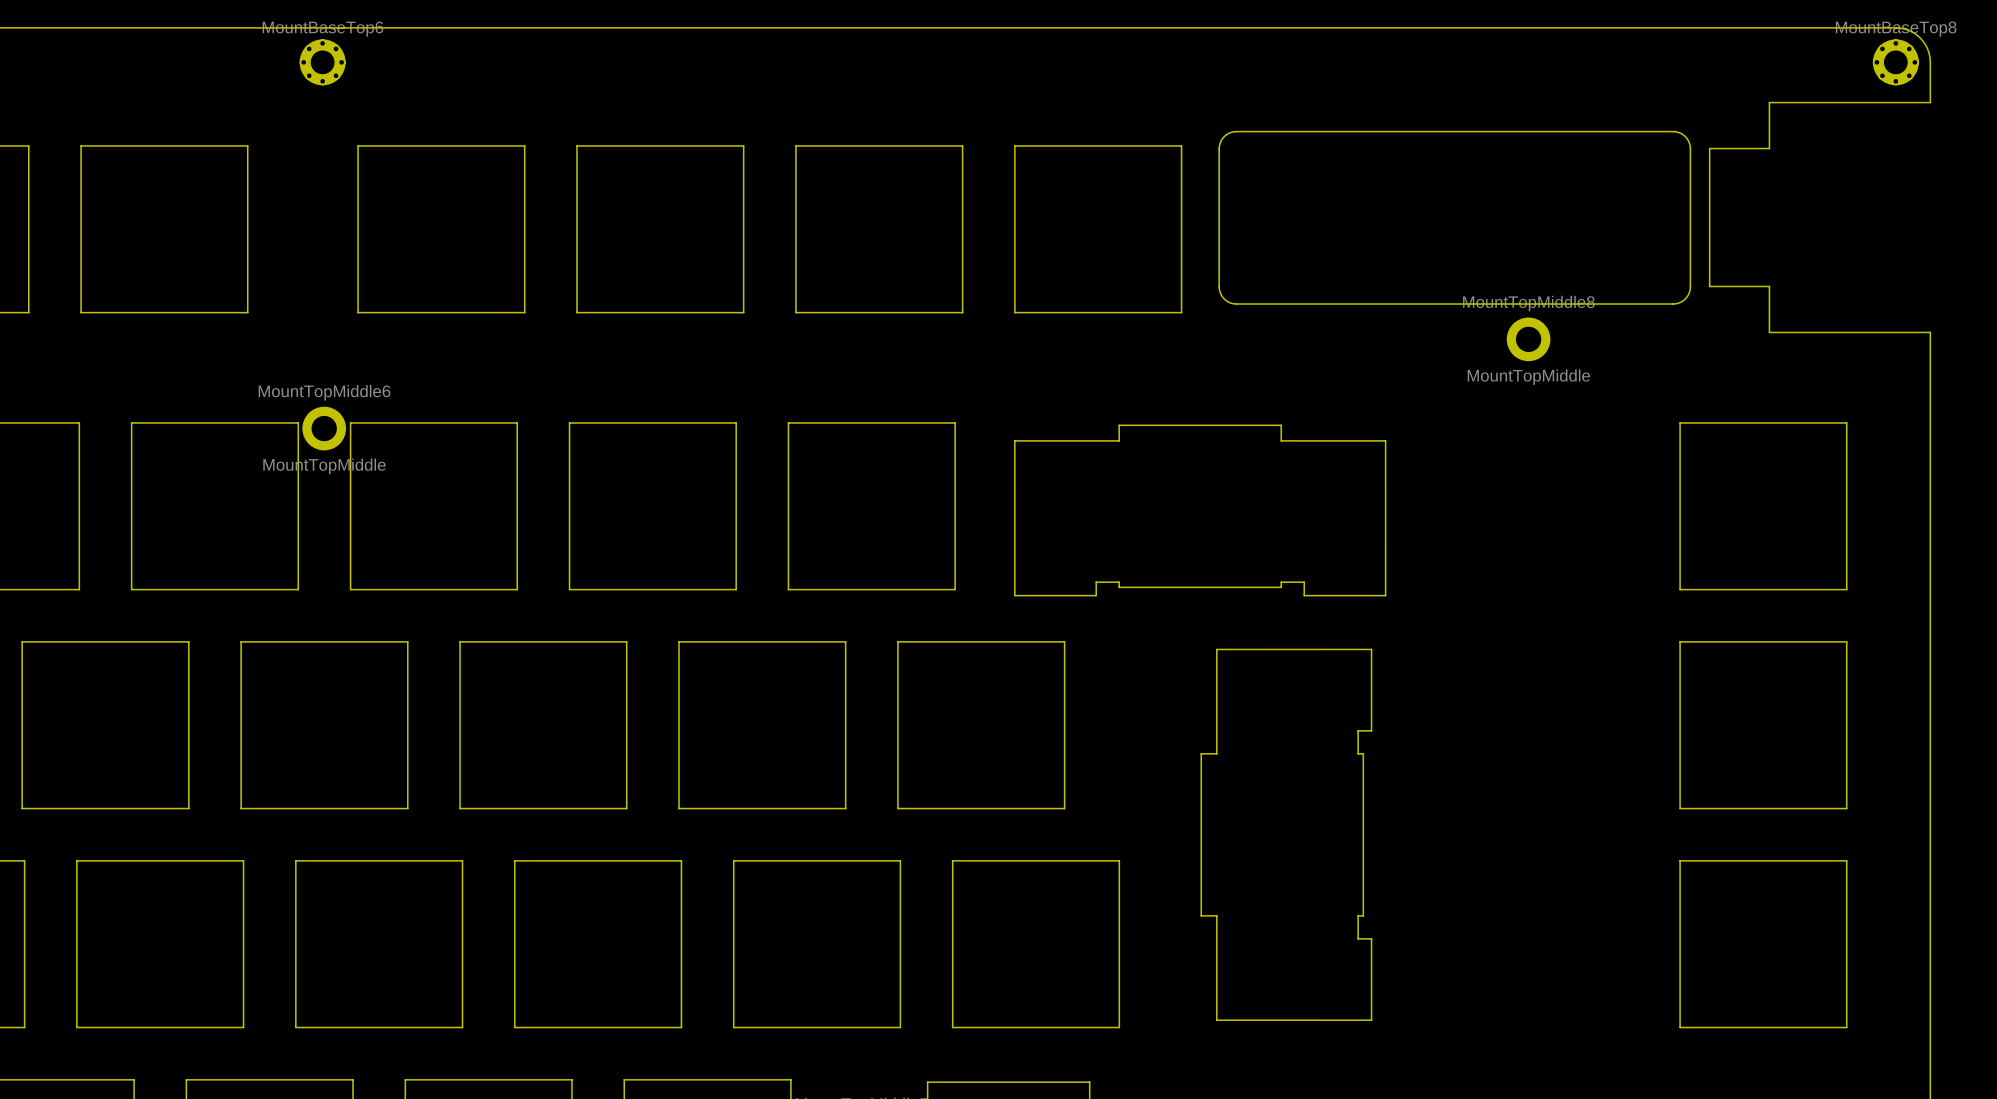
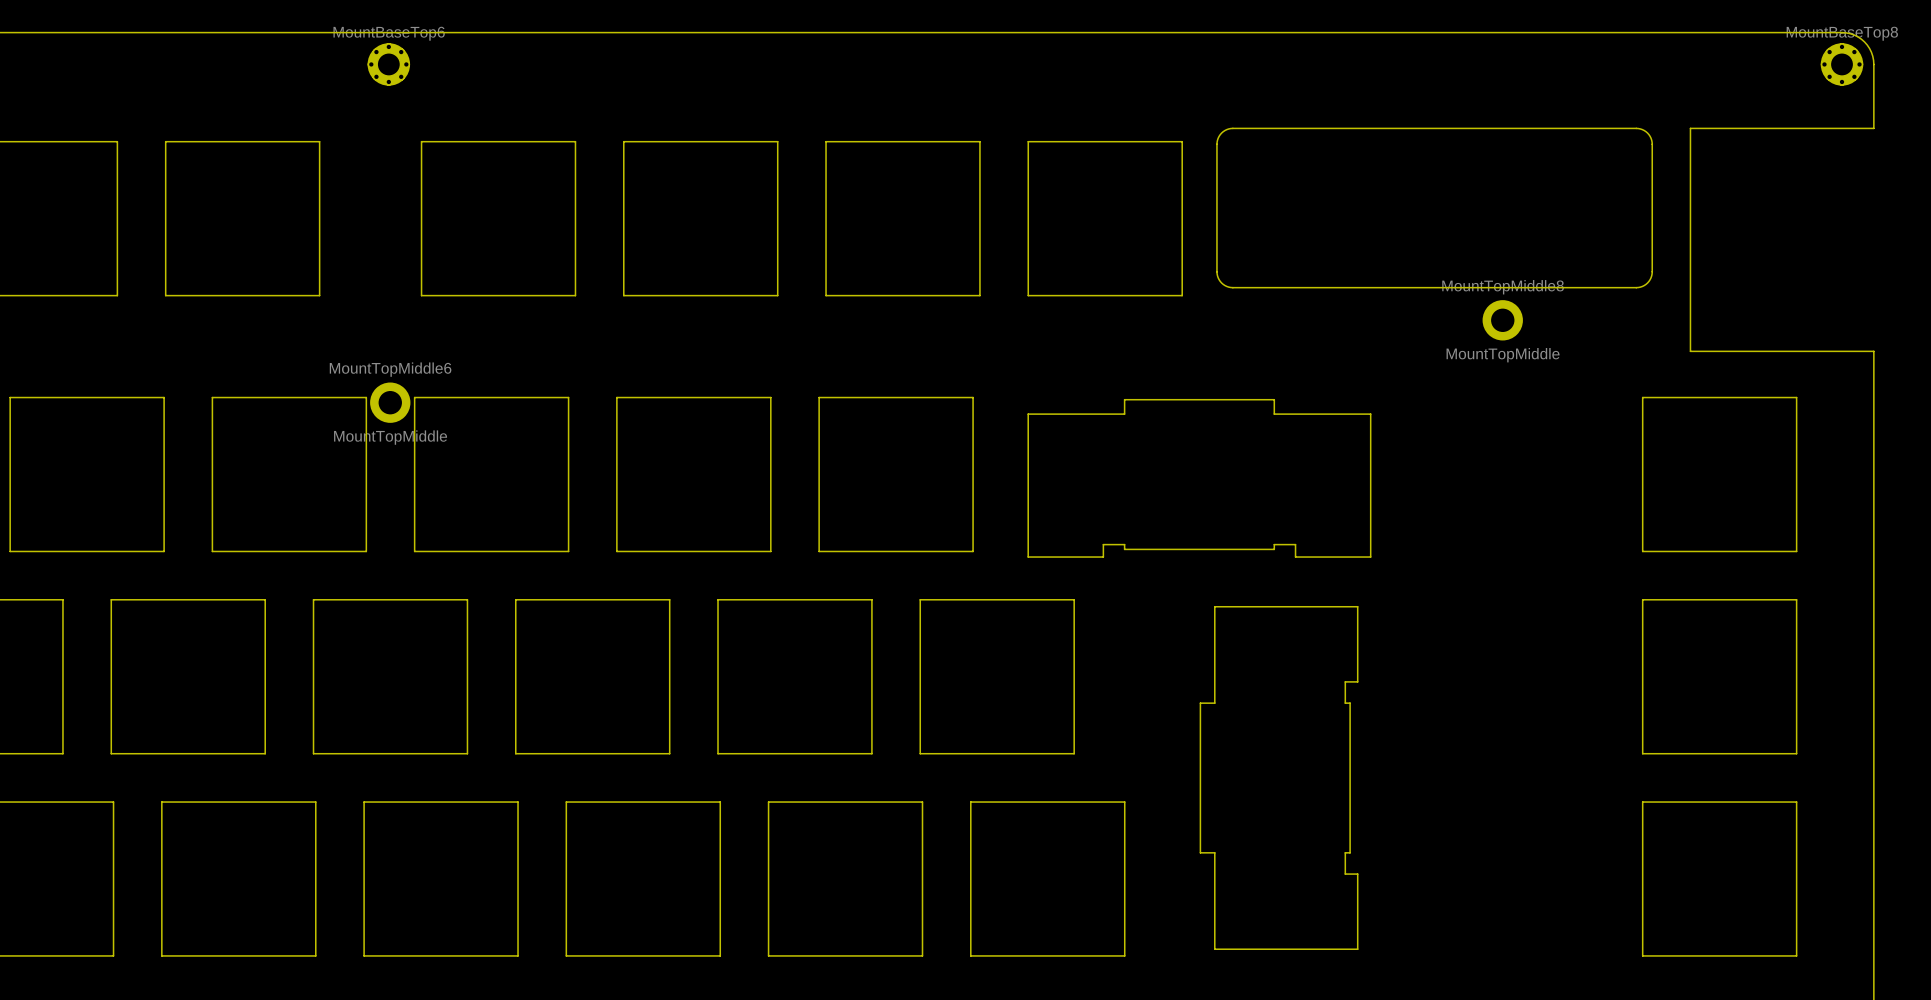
board edge: (1930, 102) (1769, 102) (1769, 148) (1709, 148) (1709, 286) (1769, 286) (1769, 332) (1930, 332) (1930, 372) -> (1873, 101) (1873, 128) (1690, 128) (1690, 351) (1873, 351)

